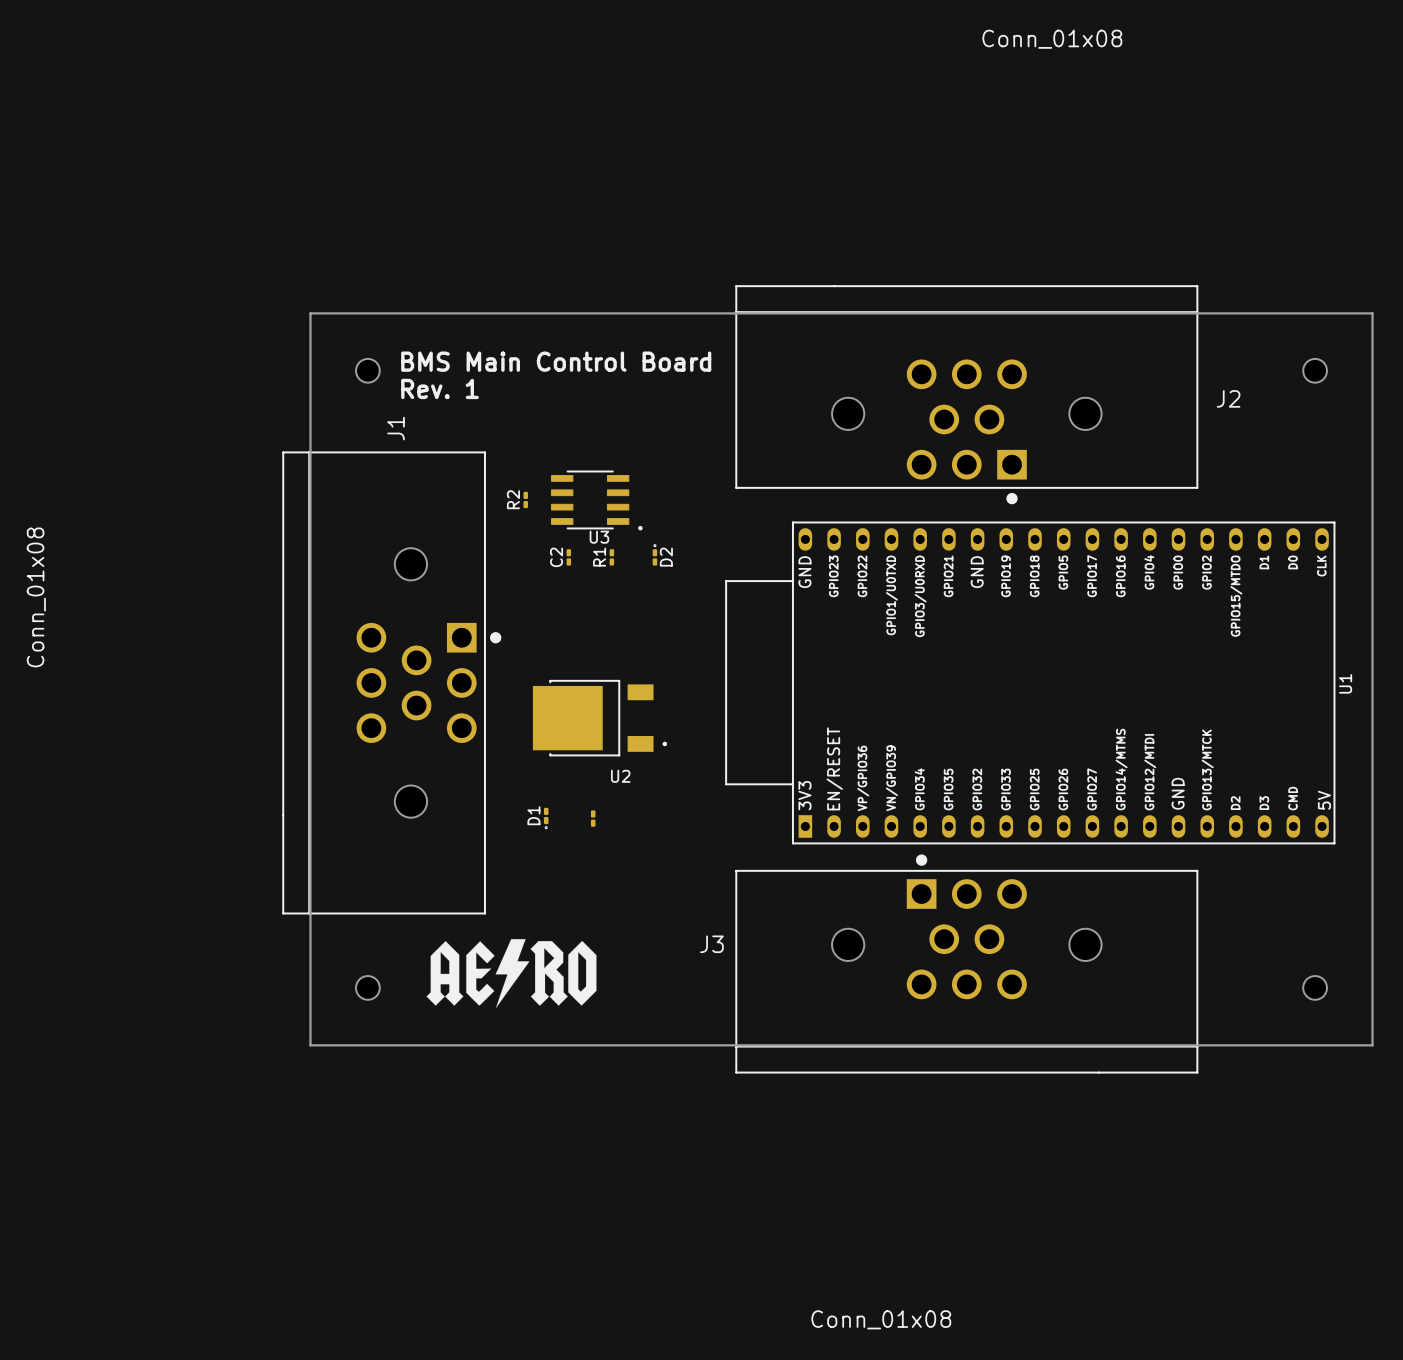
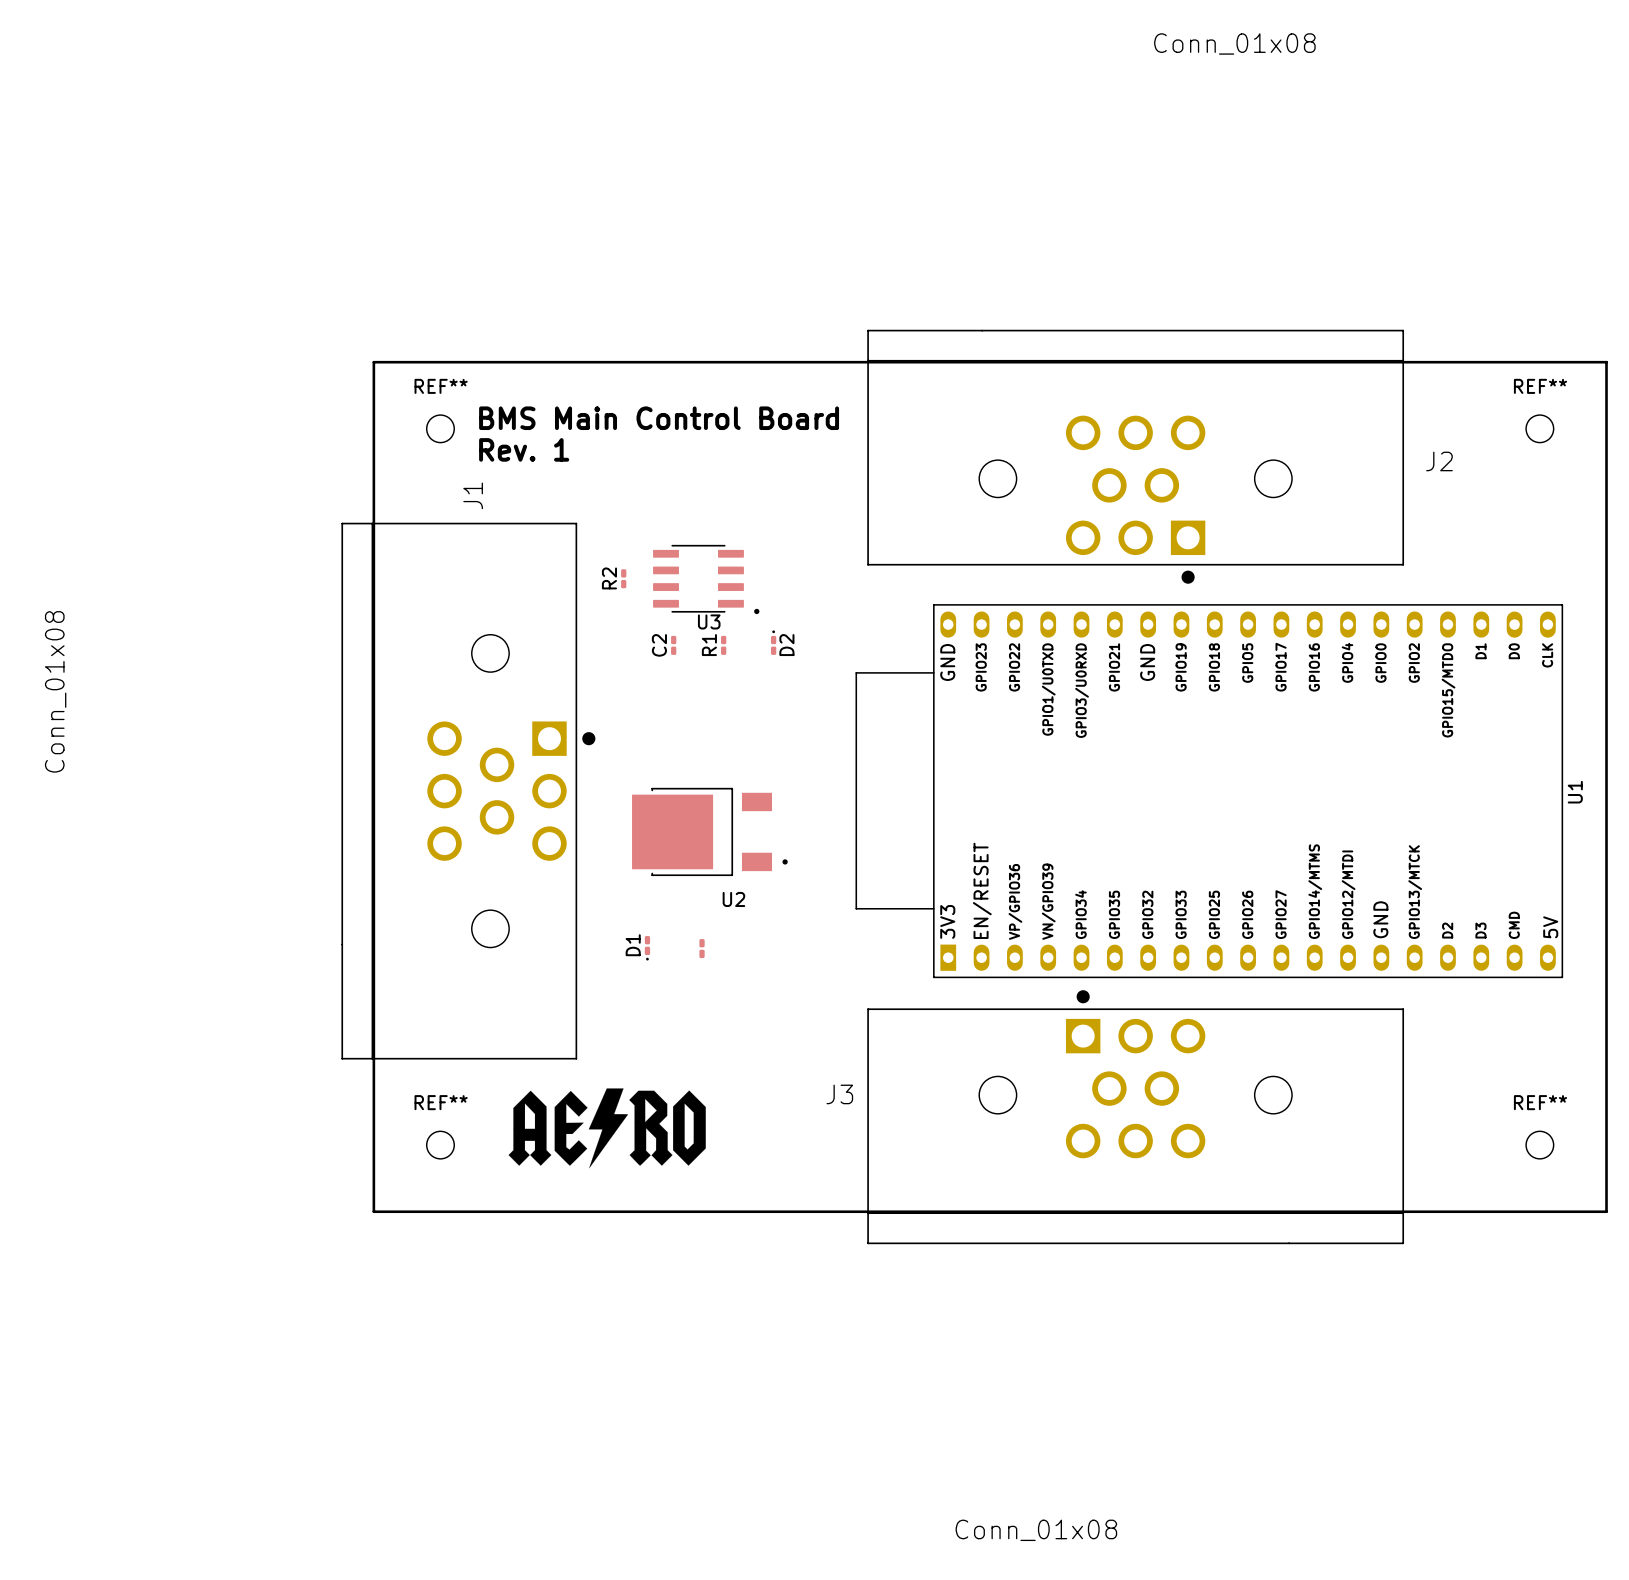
REF** name: none -> REF** (441, 386)
REF** name: none -> REF** (1540, 386)
REF** name: none -> REF** (441, 1102)
REF** name: none -> REF** (1540, 1102)

